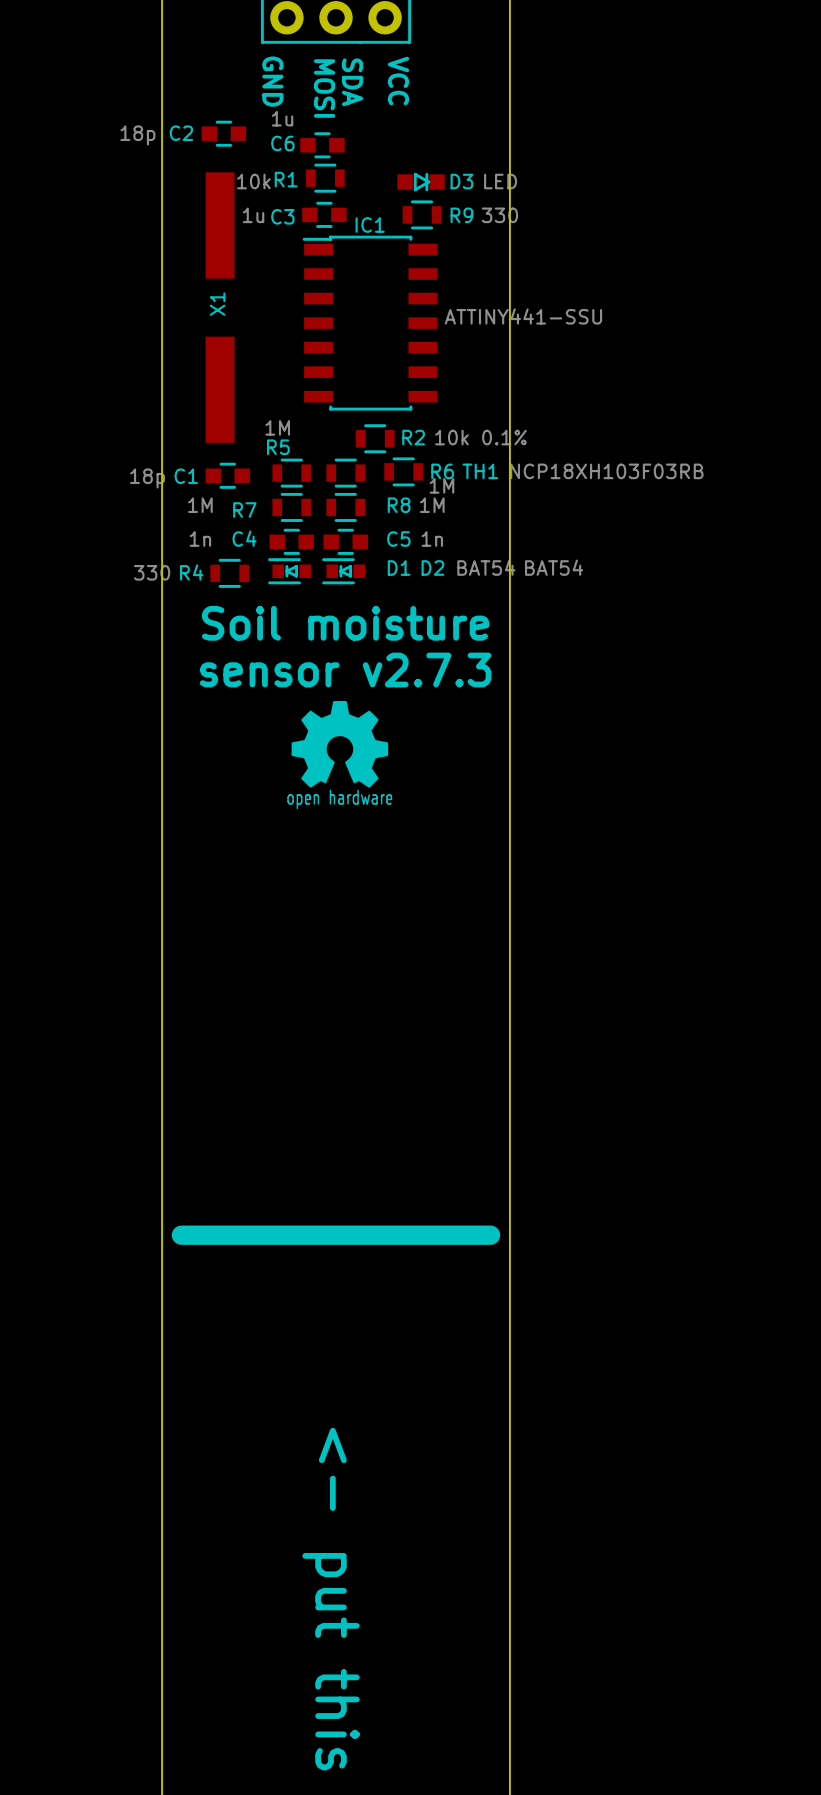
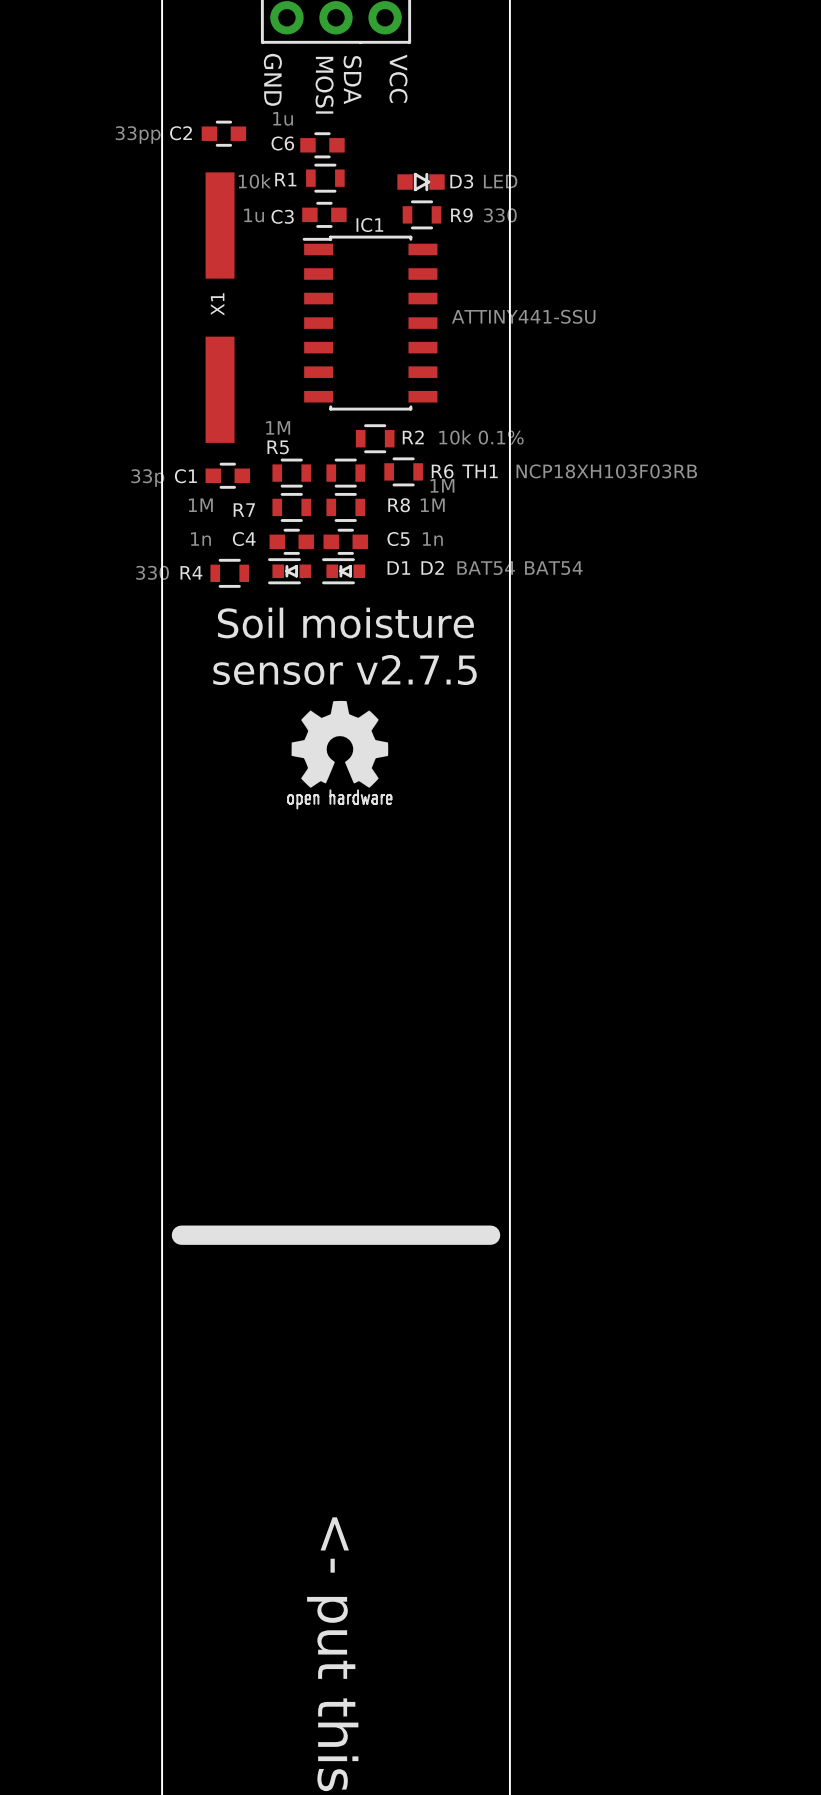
C2 value: 18p (137, 135) -> 33pp (138, 135)
C1 value: 18p (147, 478) -> 33p (147, 478)
text: sensor v2.7.3 (345, 669) -> sensor v2.7.5 (345, 670)

